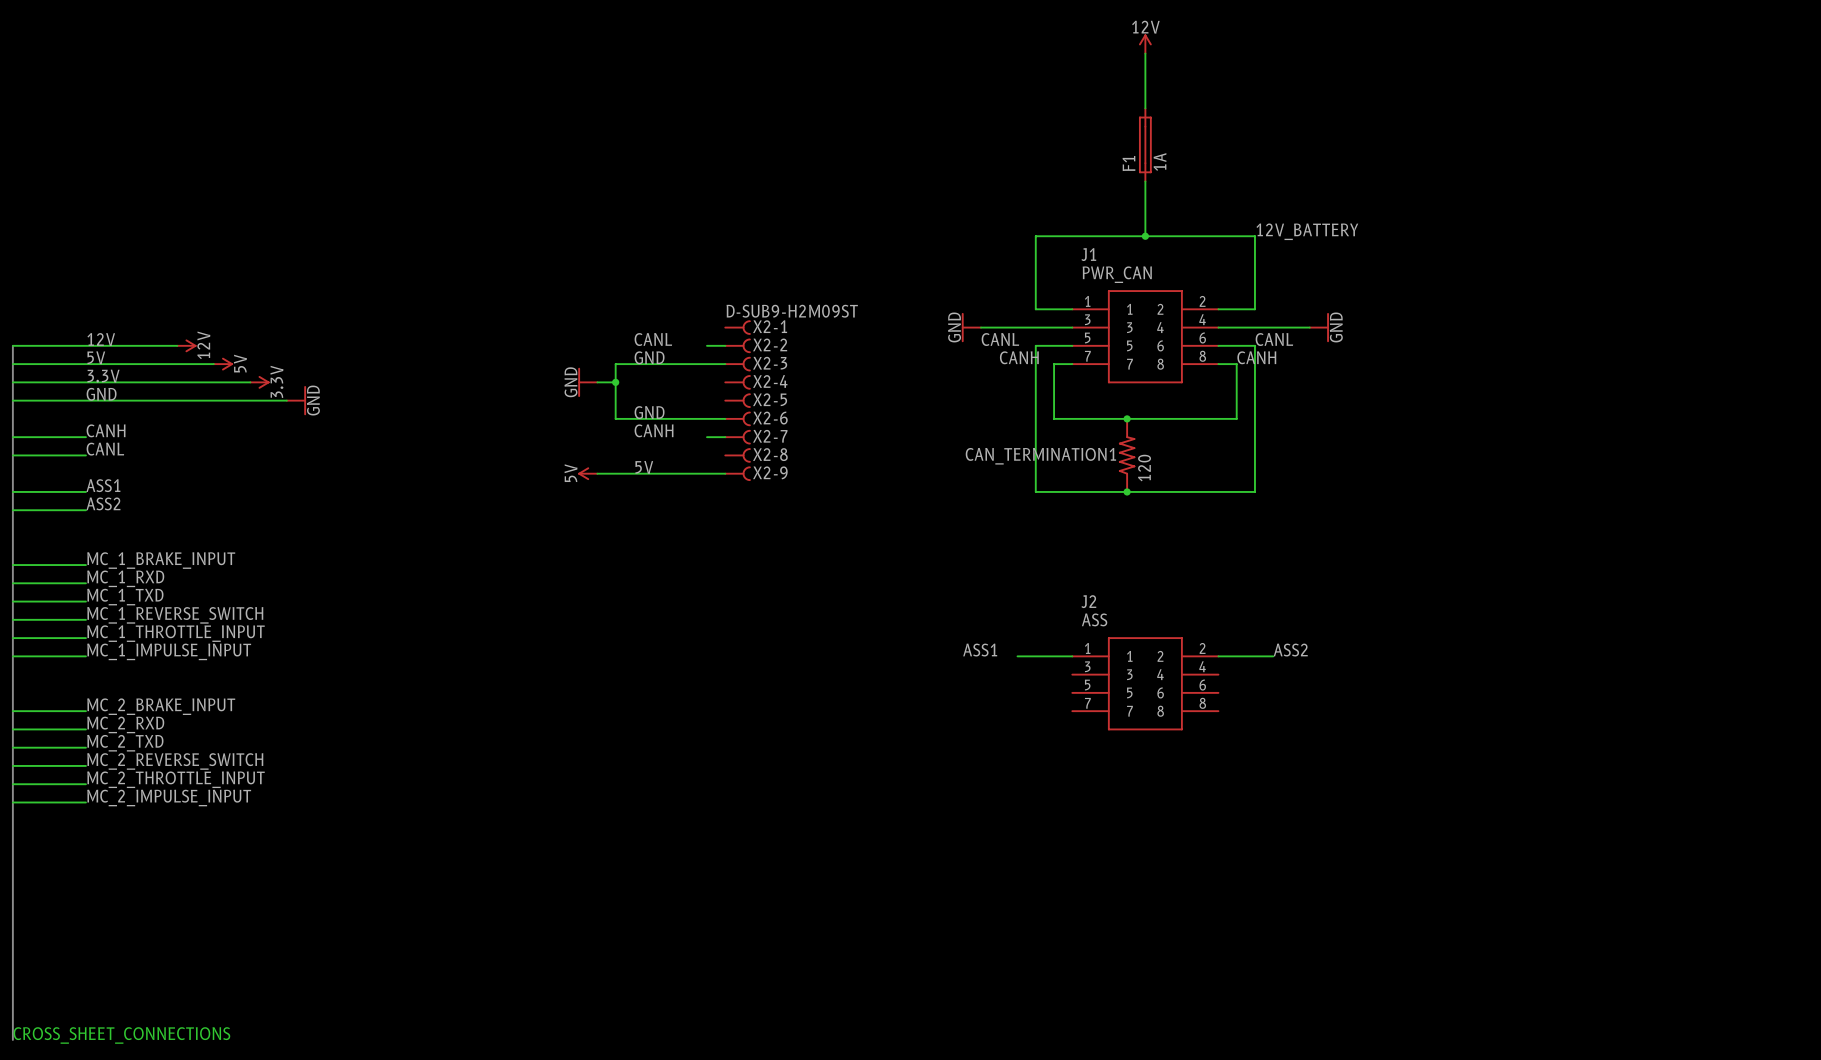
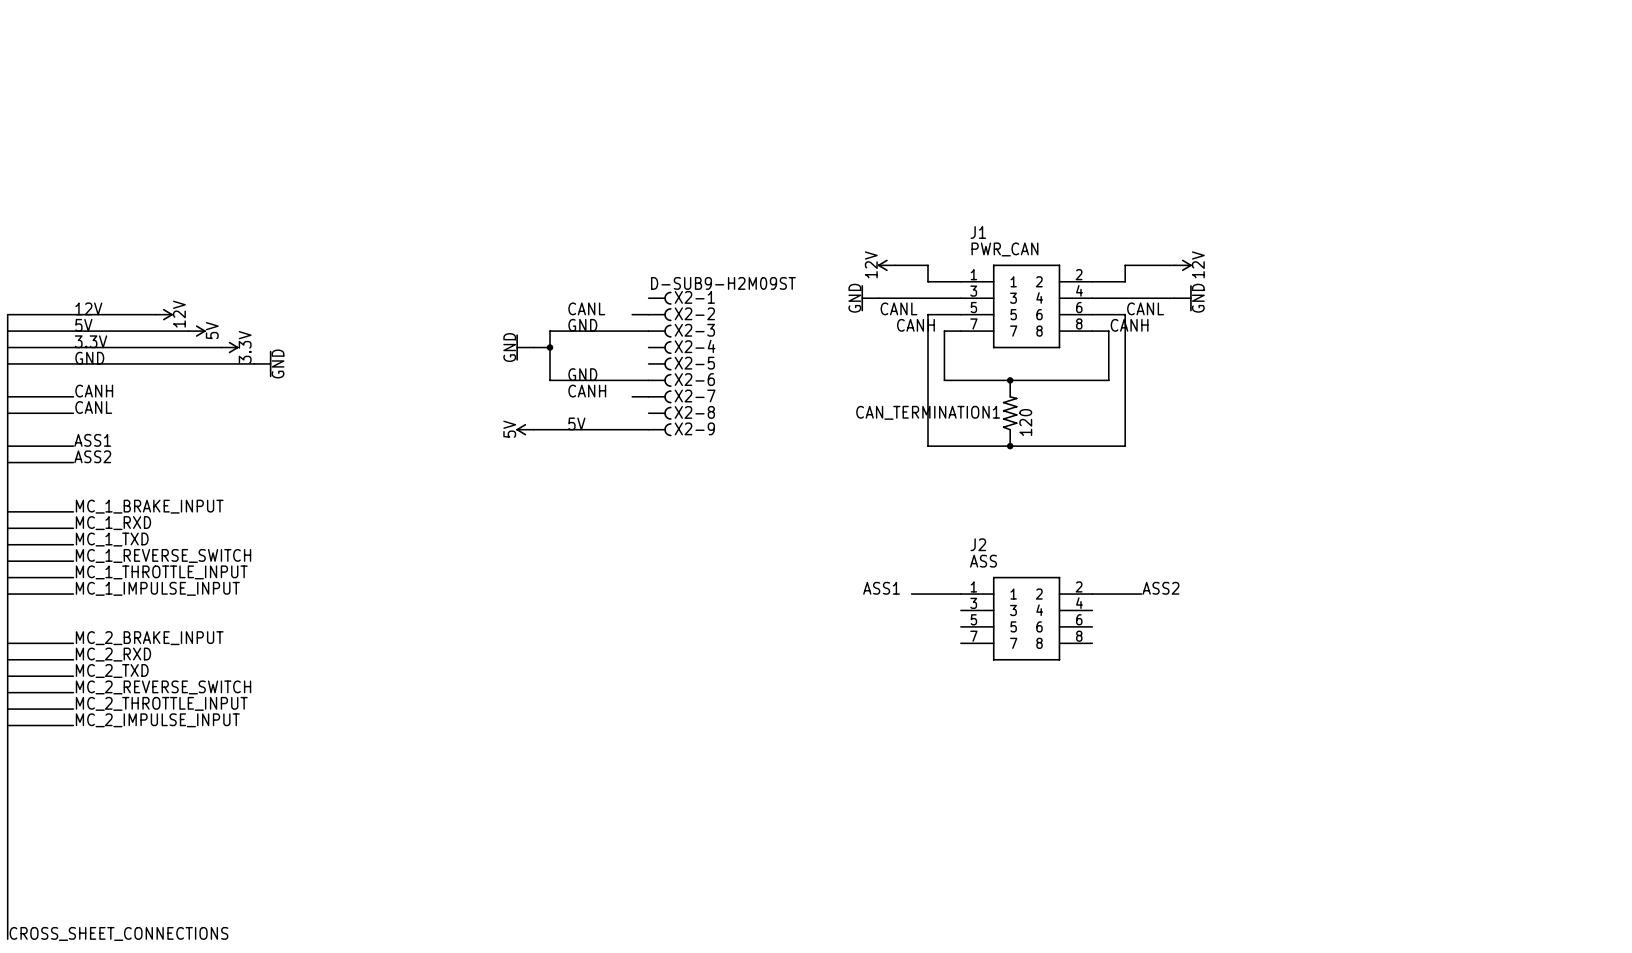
power symbol: 12V (1145, 43) -> none
wire: (1145, 53) (1145, 108) -> none
F1: 1A (1145, 144) -> none
wire: (1145, 181) (1145, 236) -> none
label: 12V_BATTERY (1307, 231) -> none
junction: (1145, 236) -> none
power symbol: none -> 12V (886, 265)
wire: (1035, 291) (1035, 236) (1254, 236) (1254, 291) -> (928, 265) (895, 265)
wire: none -> (1125, 265) (1174, 265)
power symbol: none -> 12V (1183, 265)

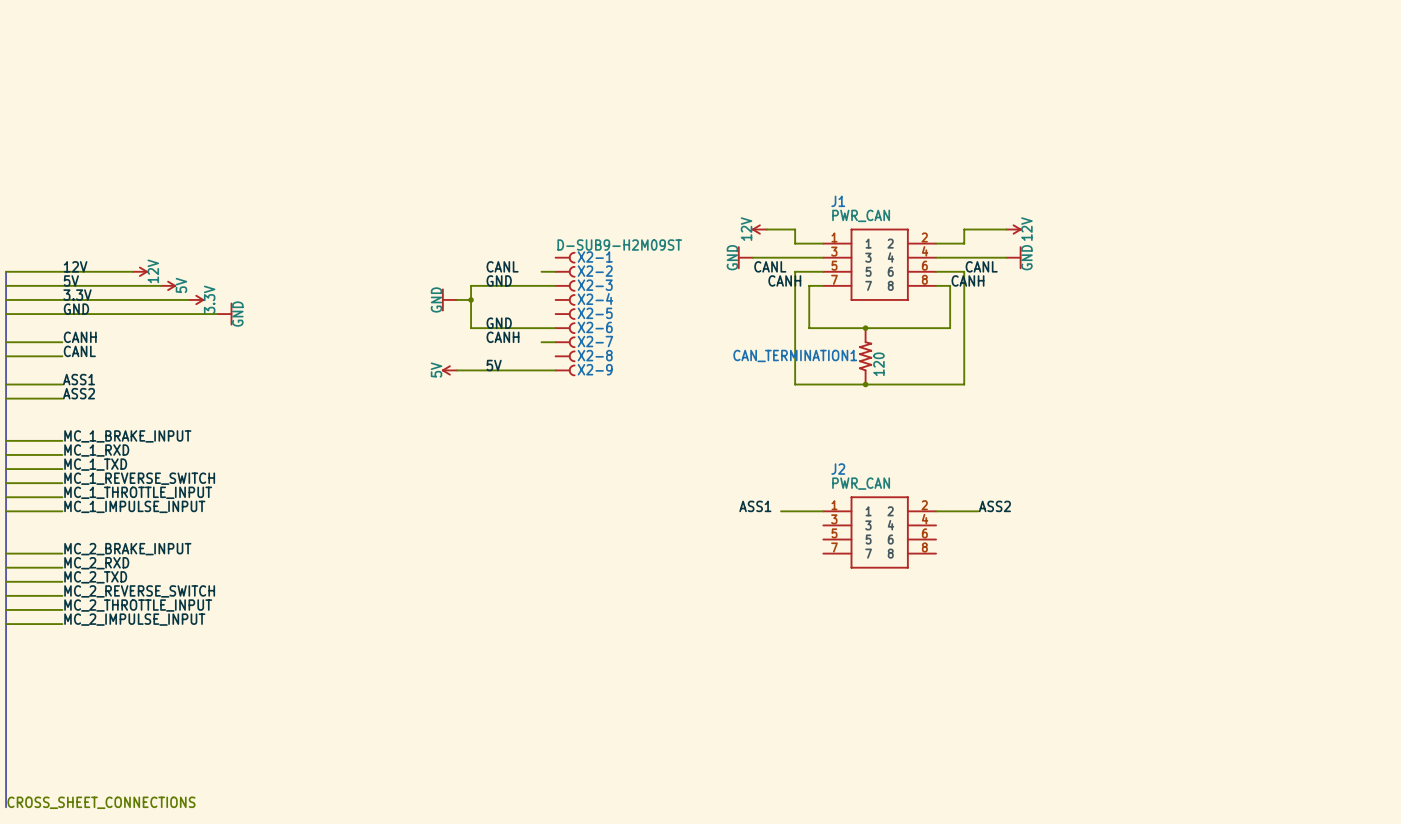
J2 value: ASS (983, 561) -> PWR_CAN (861, 483)

